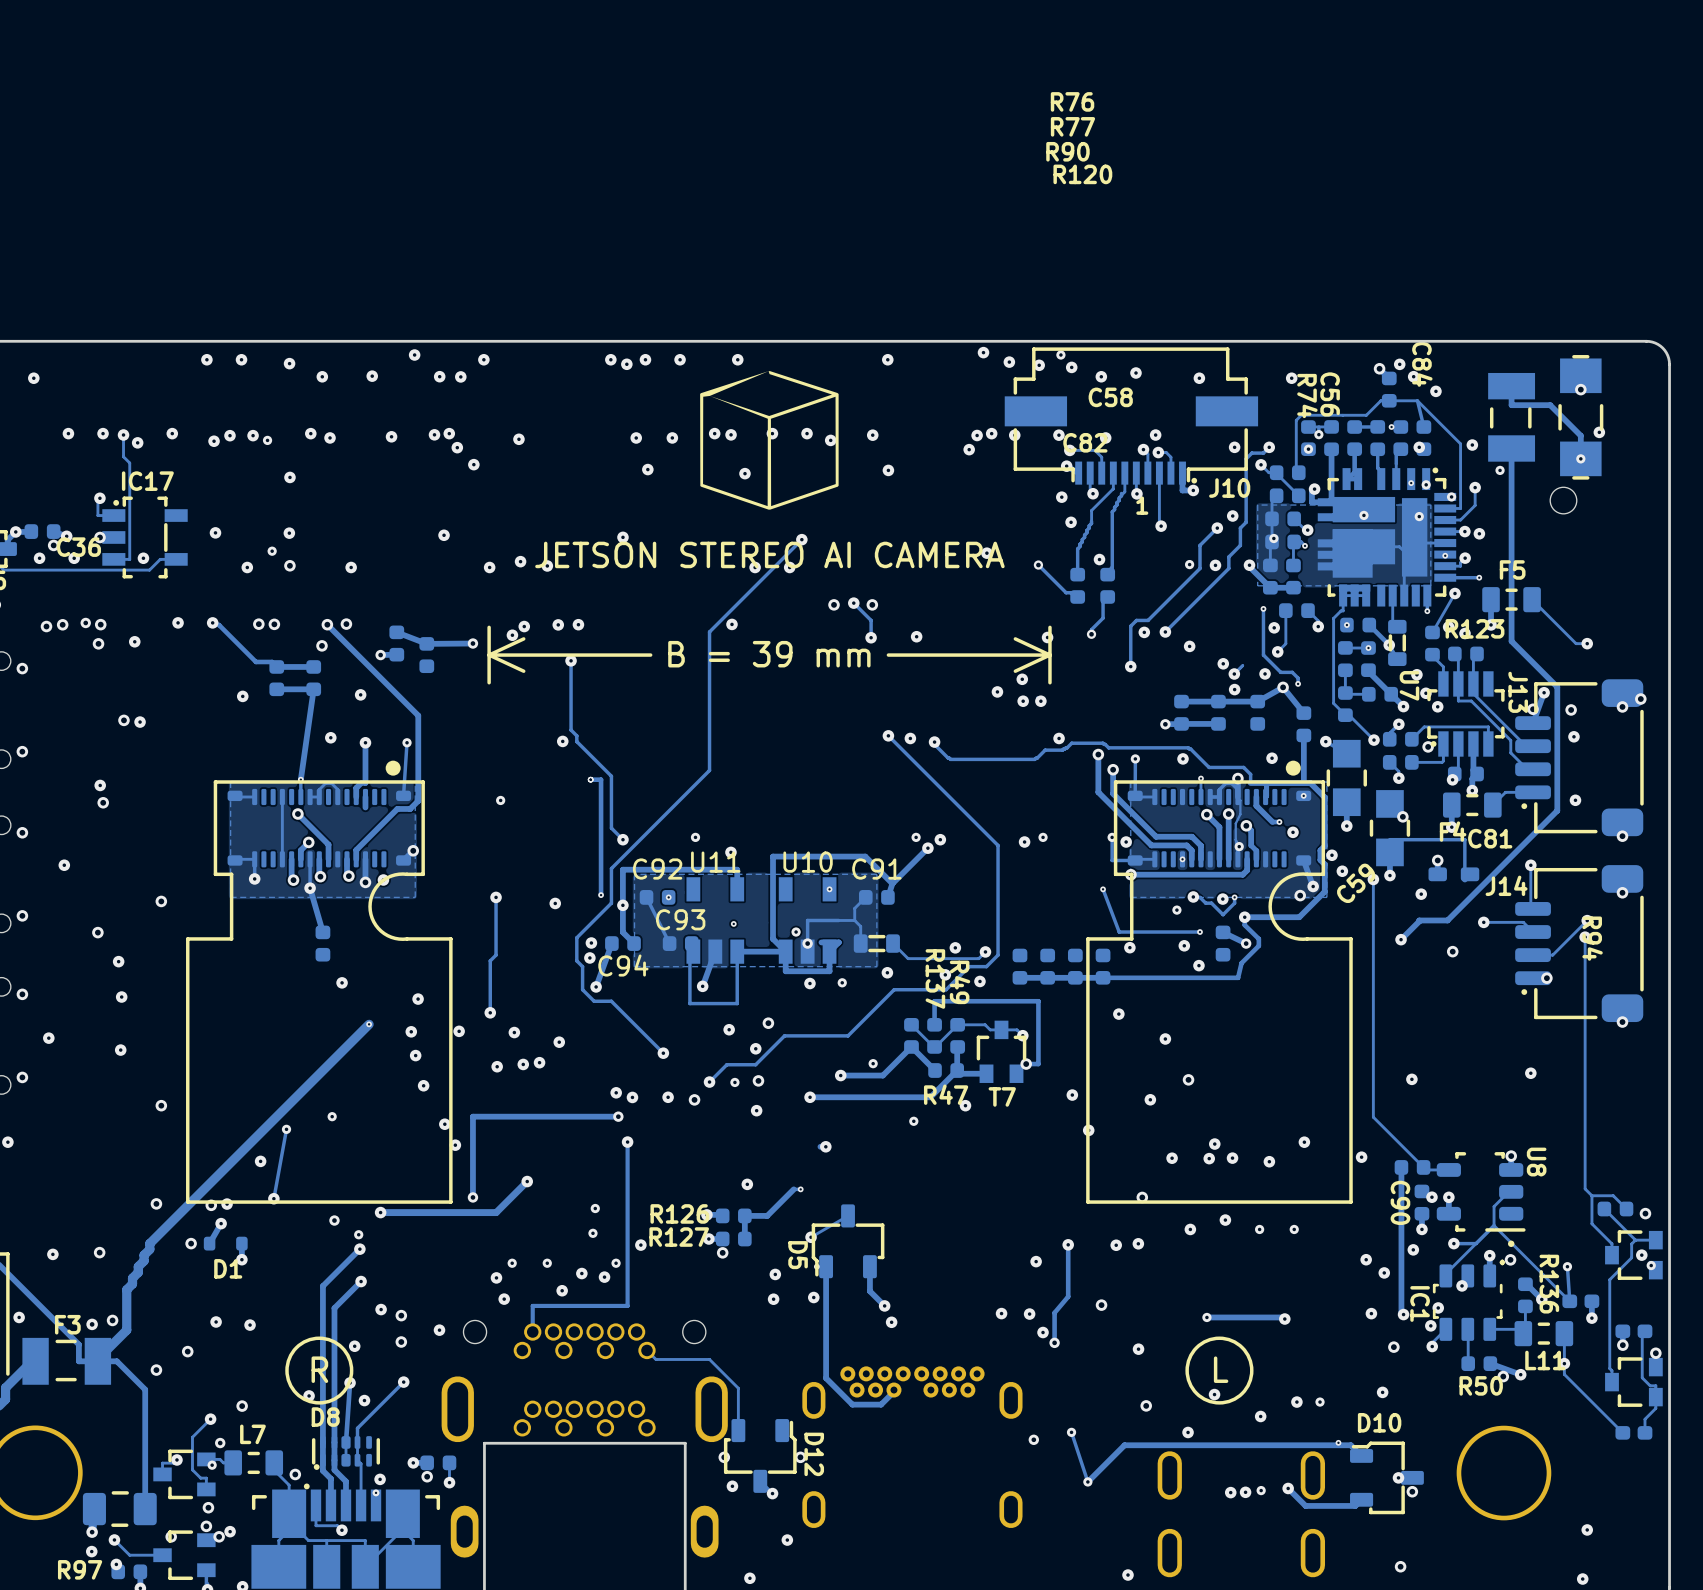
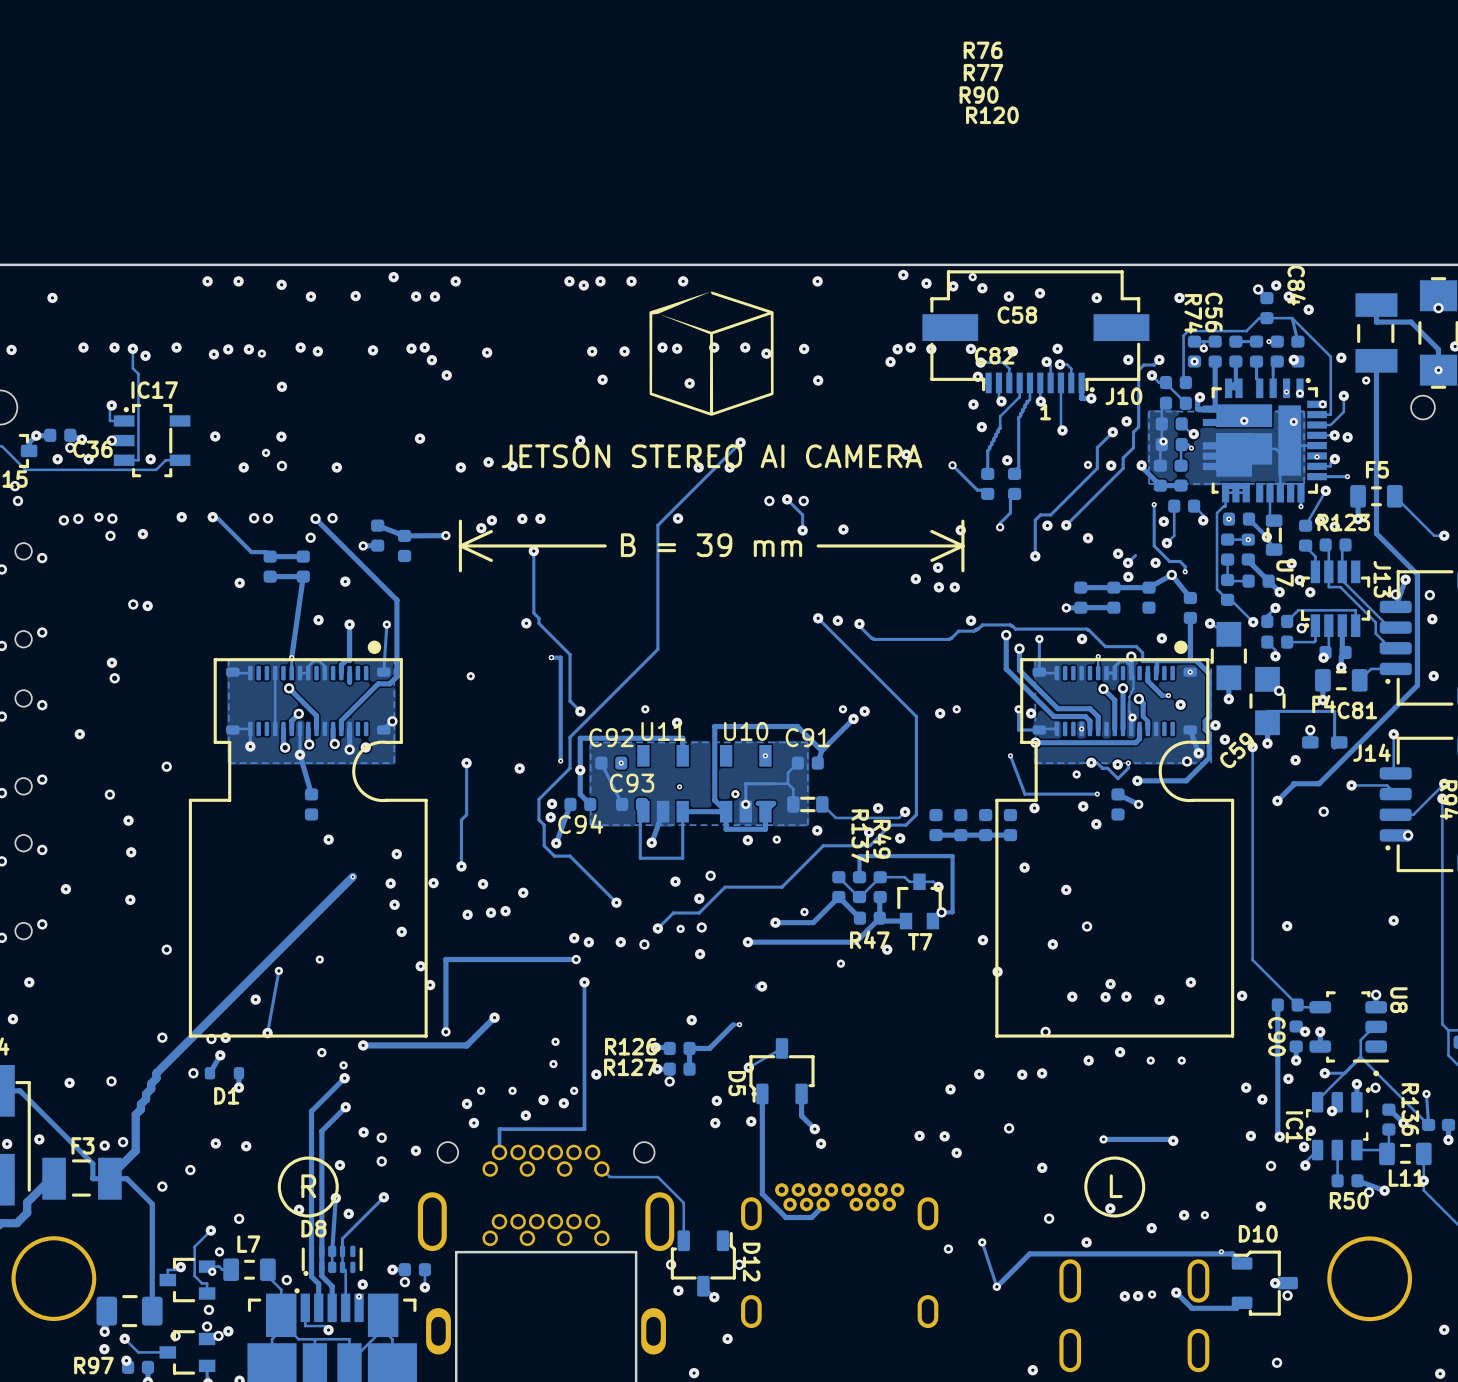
track: (1244, 917) (1244, 925) (1258, 938) (1258, 945) (1241, 963) (1238, 977) (1103, 977) -> none
track: (1068, 1244) (1068, 1296) (1054, 1312) (1054, 1342) -> none
via: (1054, 1342) -> none

